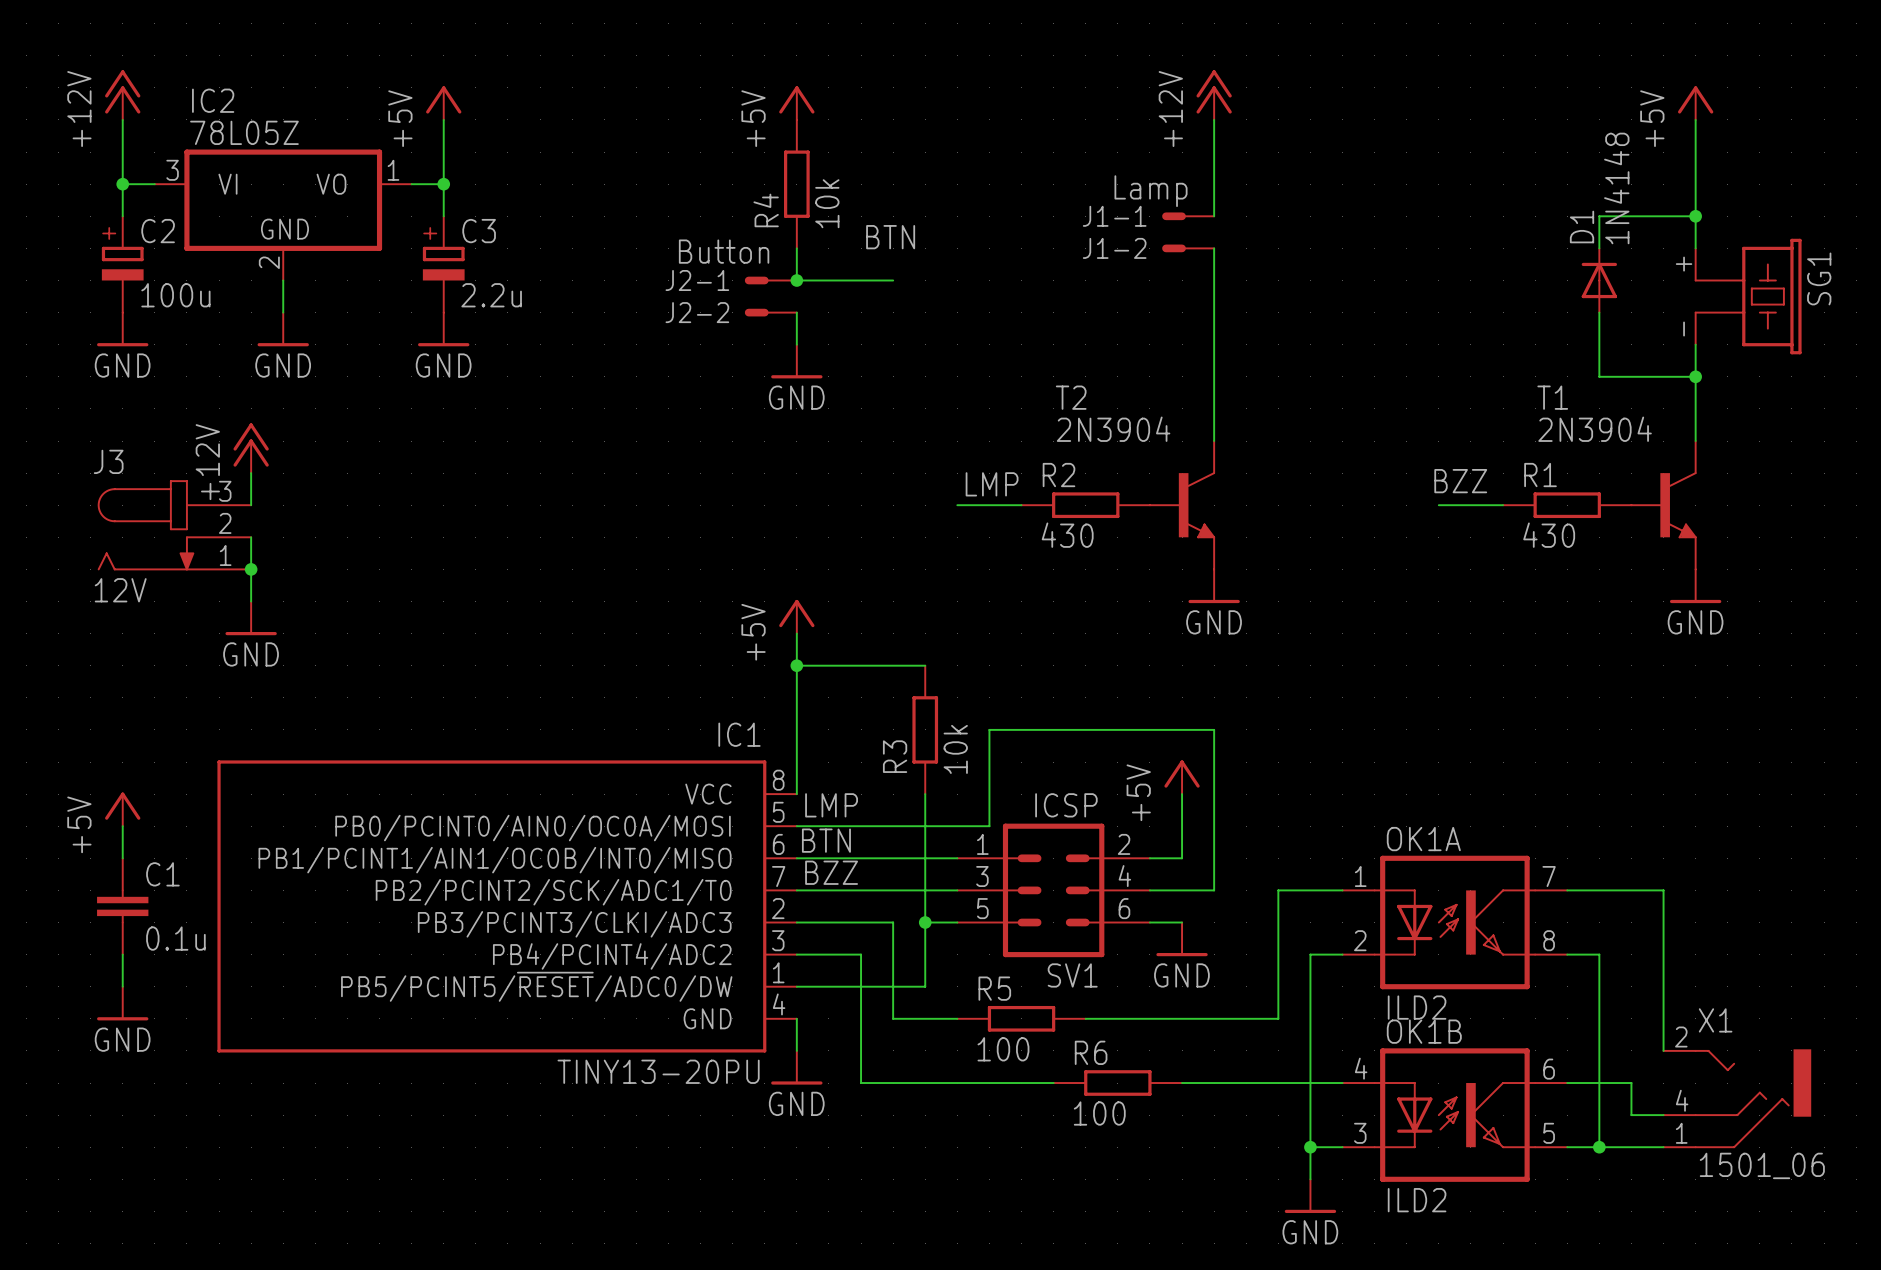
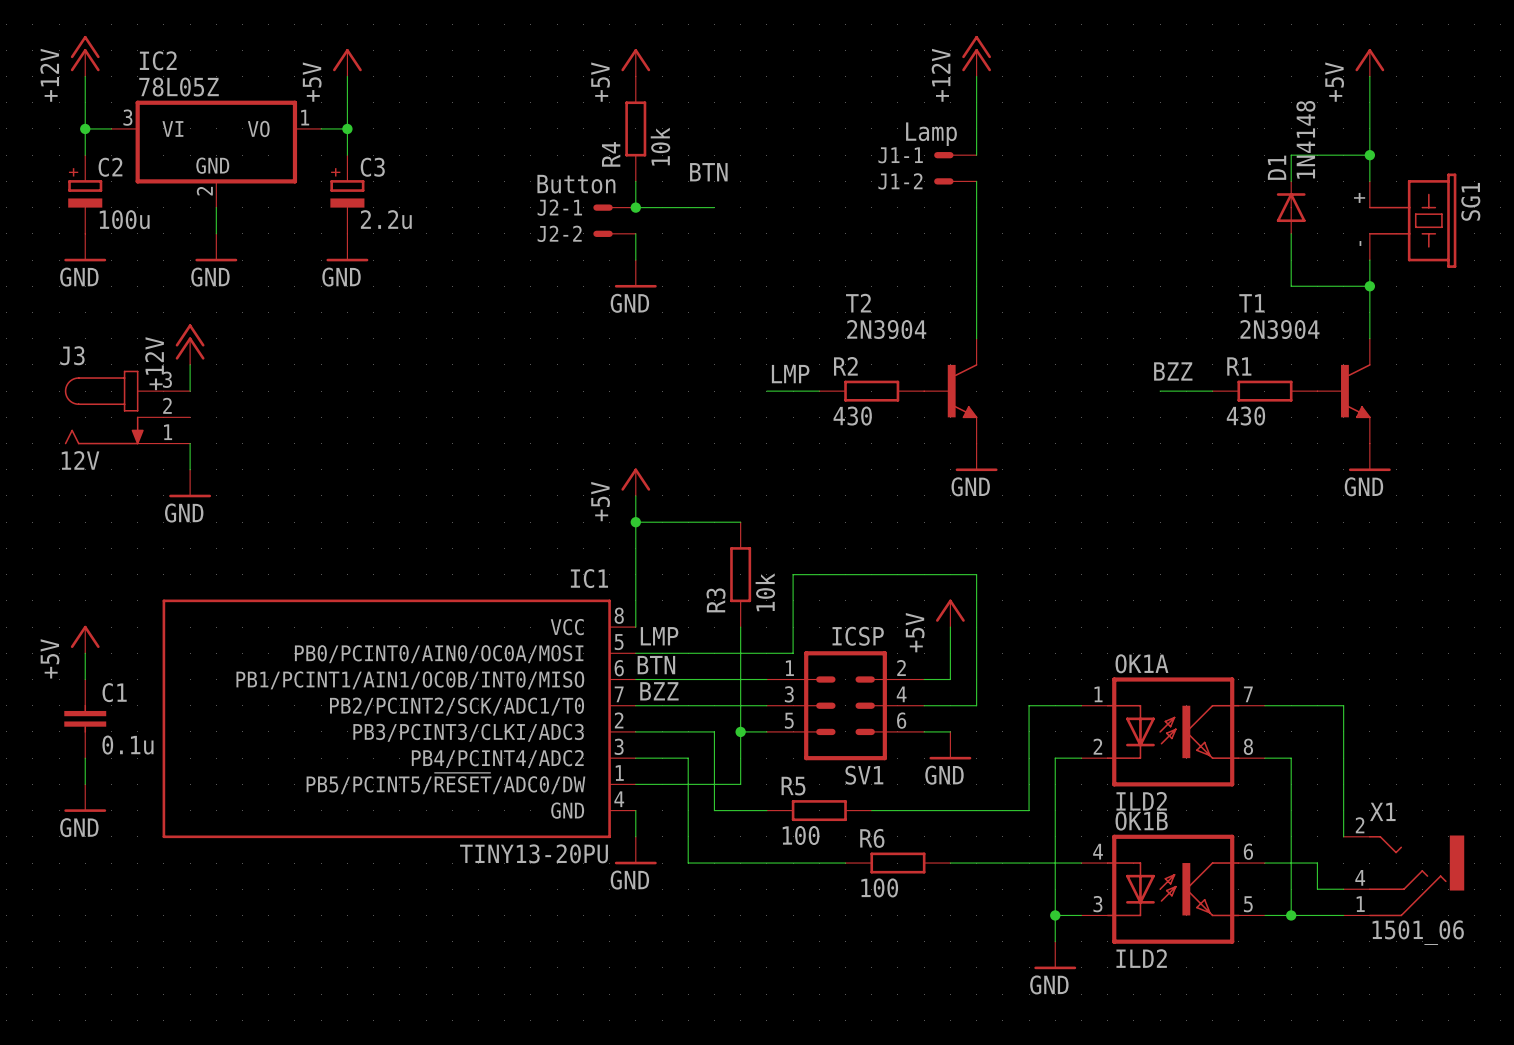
wire: (251, 537) (251, 569) -> none
junction: (251, 569) -> none

